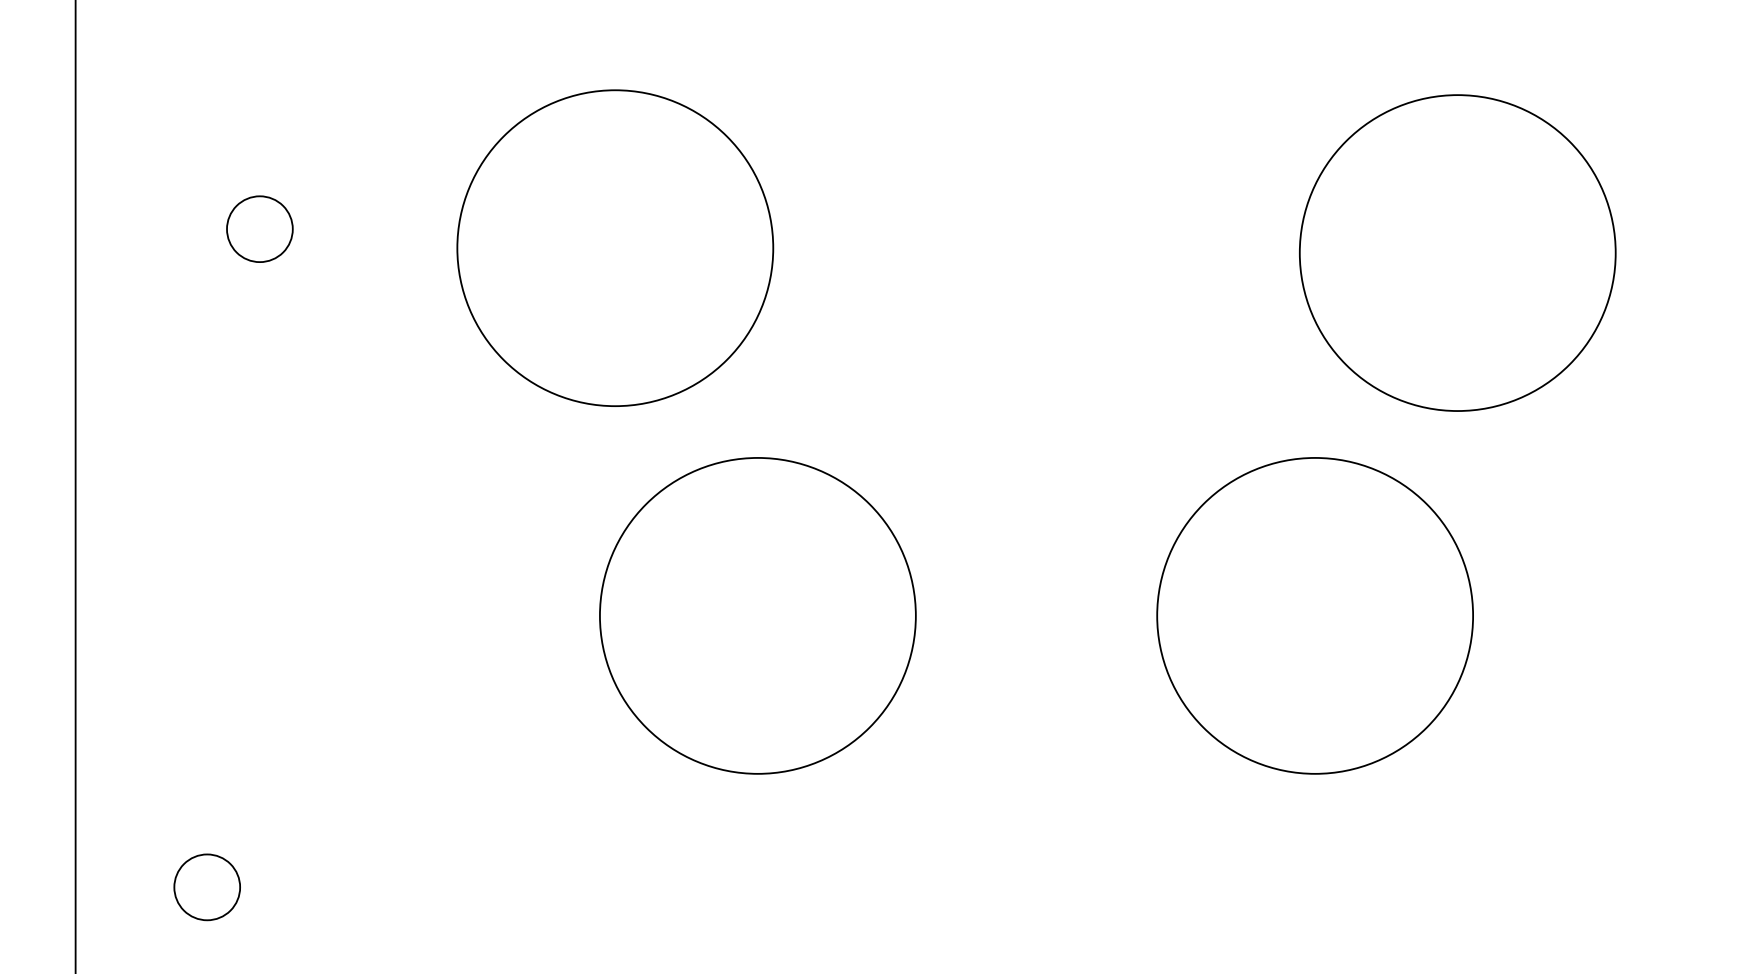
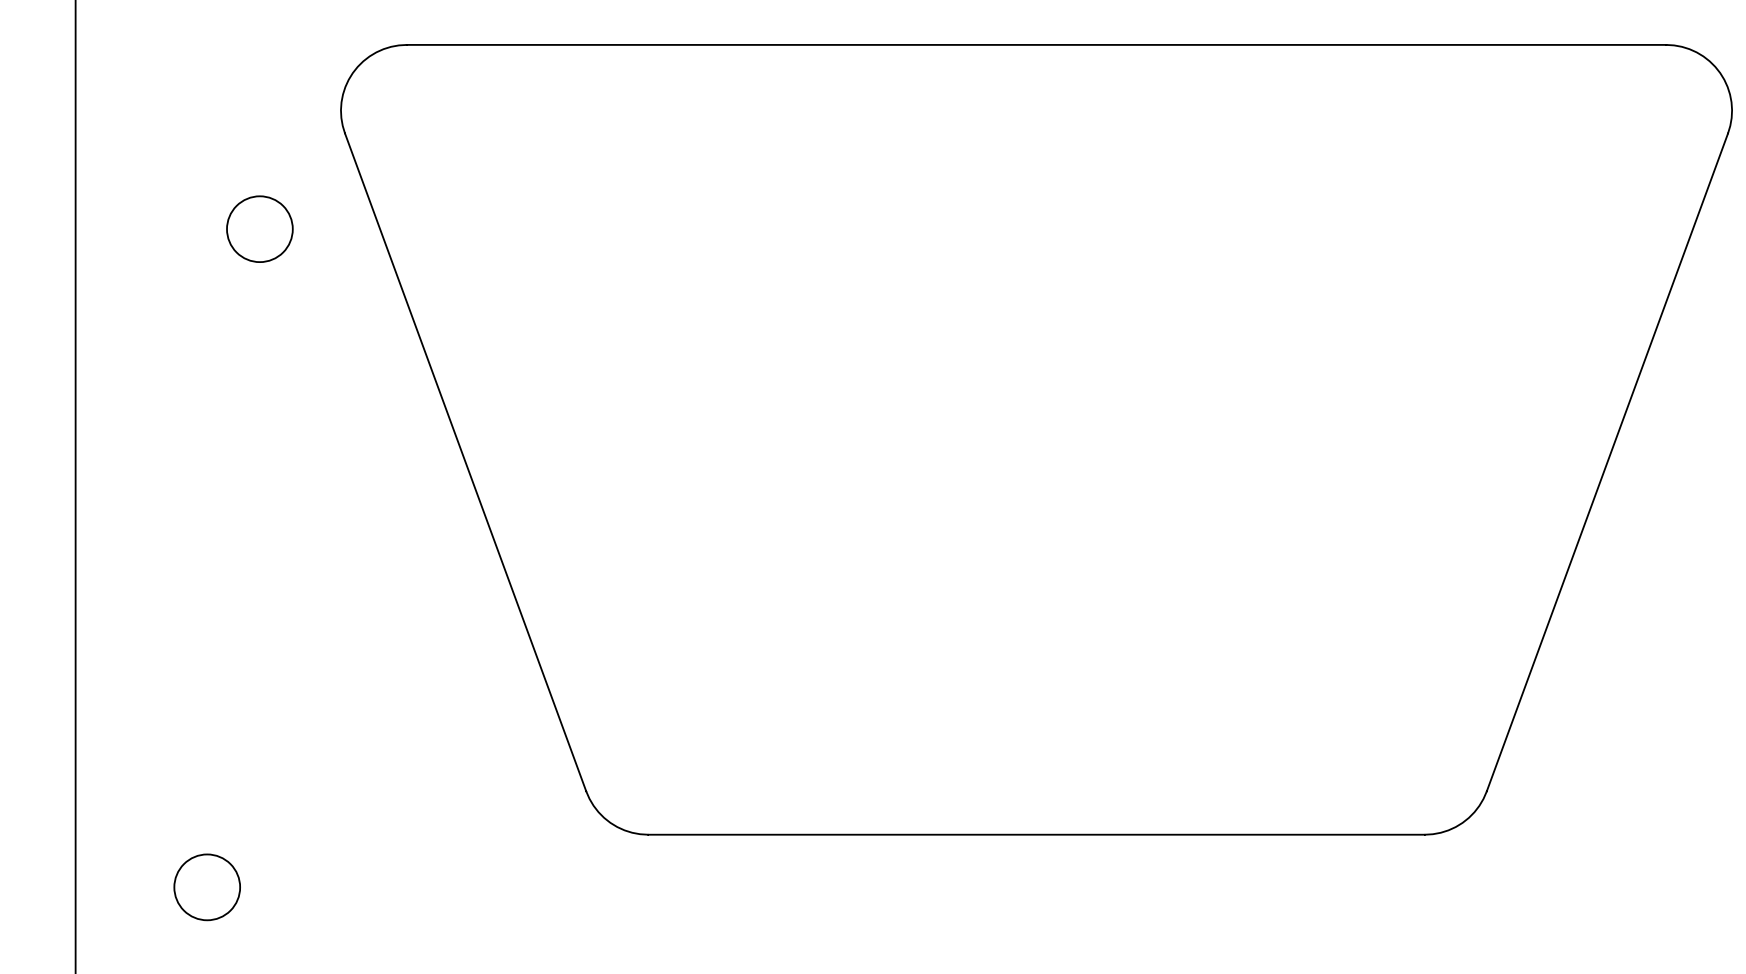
board edge: none -> (406, 44) (1666, 44) (1689, 49) (1703, 56) (1715, 66) (1724, 79) (1730, 94) (1731, 118) (1728, 133) (1486, 791) (1474, 812) (1462, 822) (1448, 830) (1424, 834) (648, 834) (624, 830) (610, 822) (598, 812) (586, 791) (345, 133) (341, 118) (341, 102) (345, 86) (352, 73) (363, 61) (376, 52) (391, 46) (406, 44)
round board edge: [457, 90, 774, 407] -> none
round board edge: [1299, 94, 1616, 412] -> none
round board edge: [599, 457, 917, 774] -> none
round board edge: [1157, 457, 1474, 774] -> none

